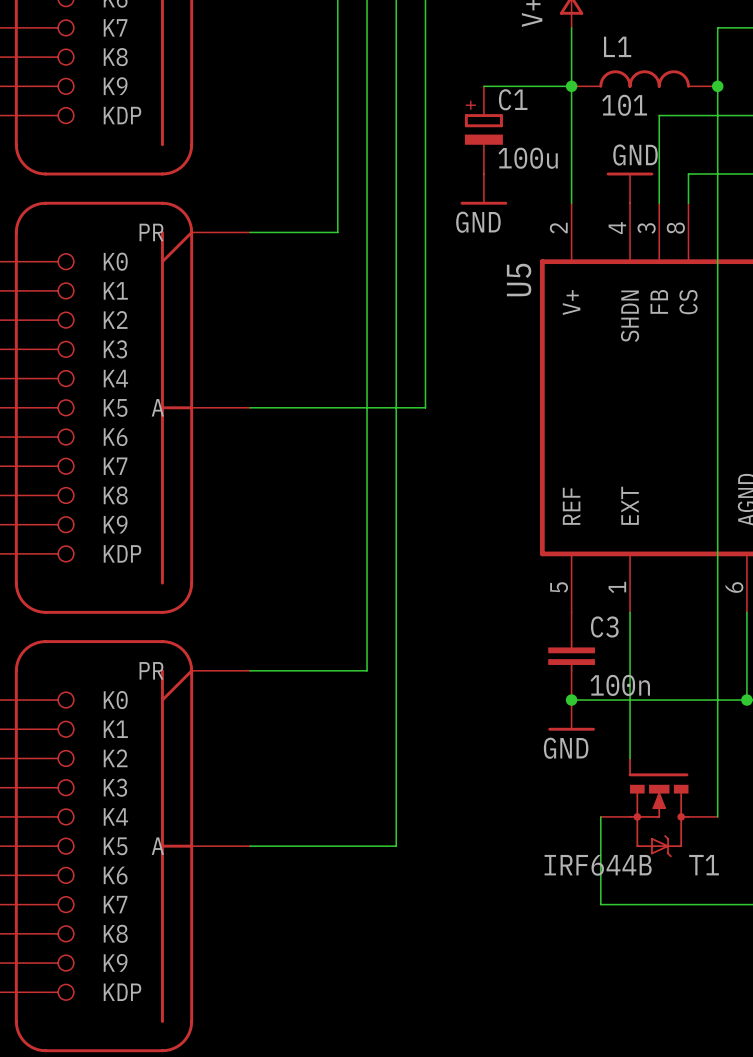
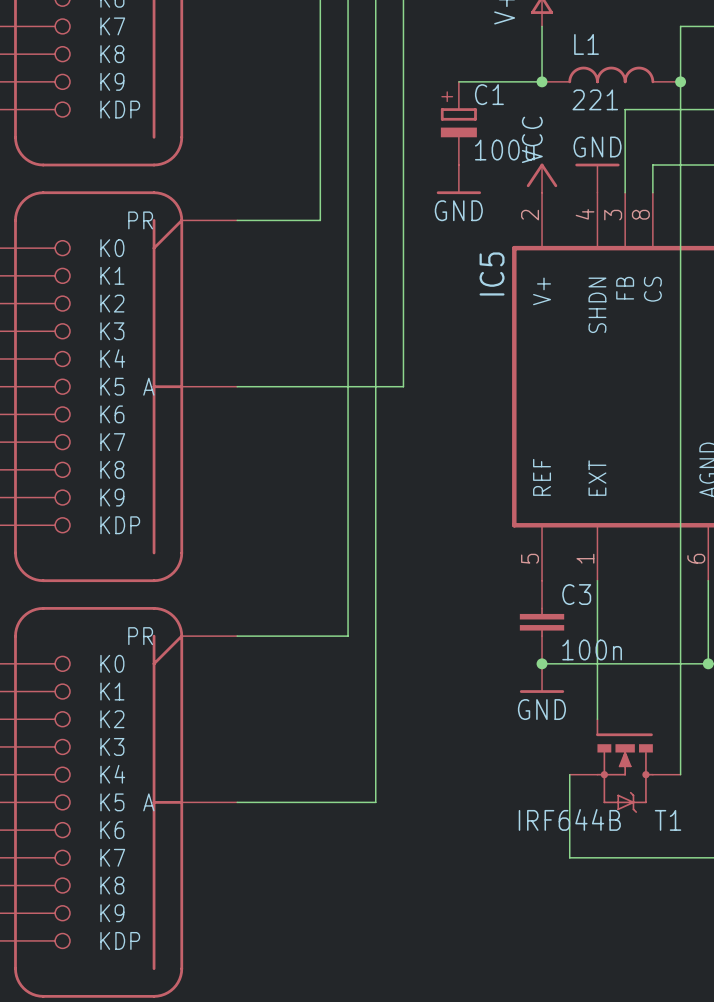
wire: (571, 86) (571, 203) -> none
L1 value: 101 (624, 105) -> 221 (595, 99)
power symbol: none -> VCC (542, 178)
U5 name: U5 (519, 280) -> IC5 (492, 273)

